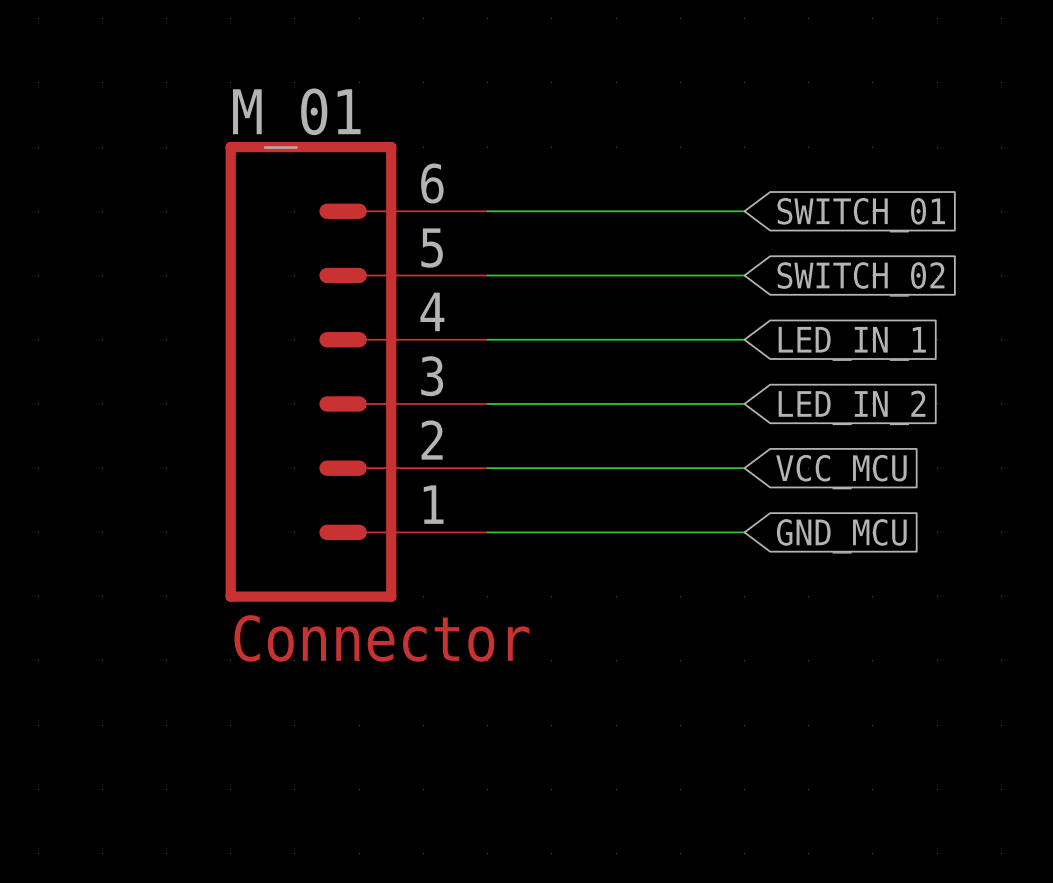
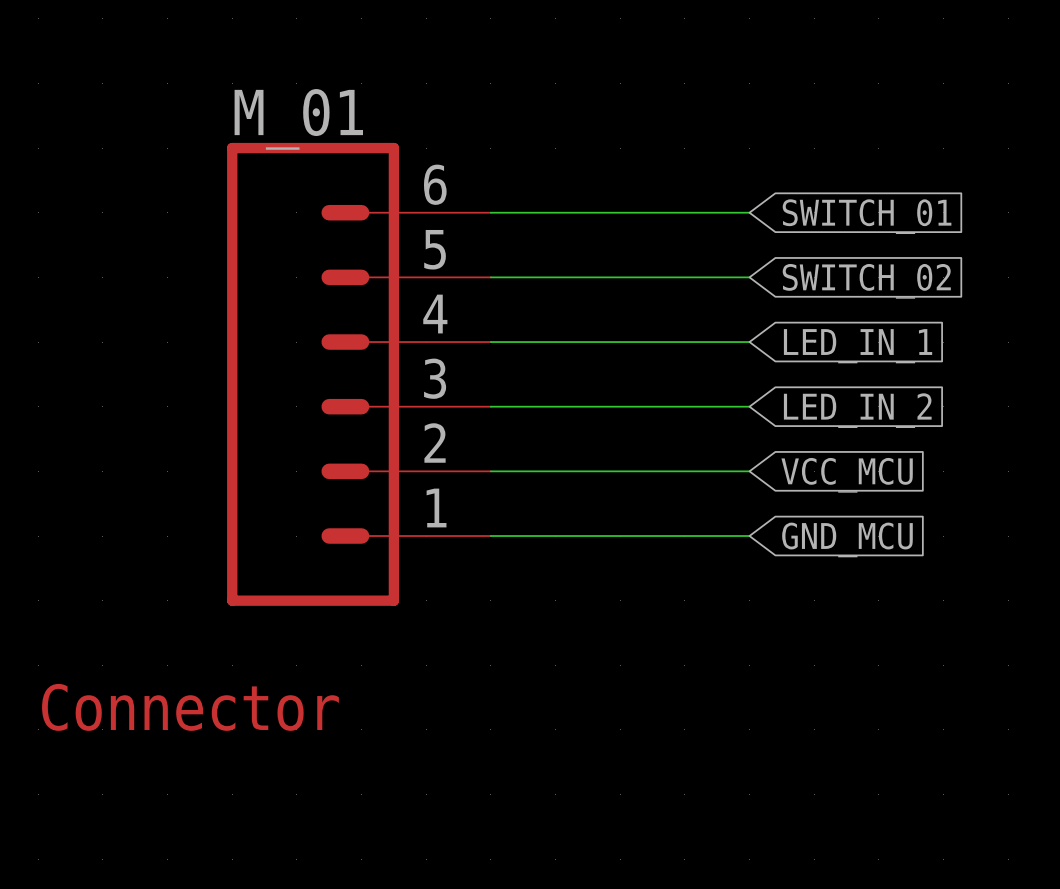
text position: Connector (381, 638) -> Connector (190, 707)

